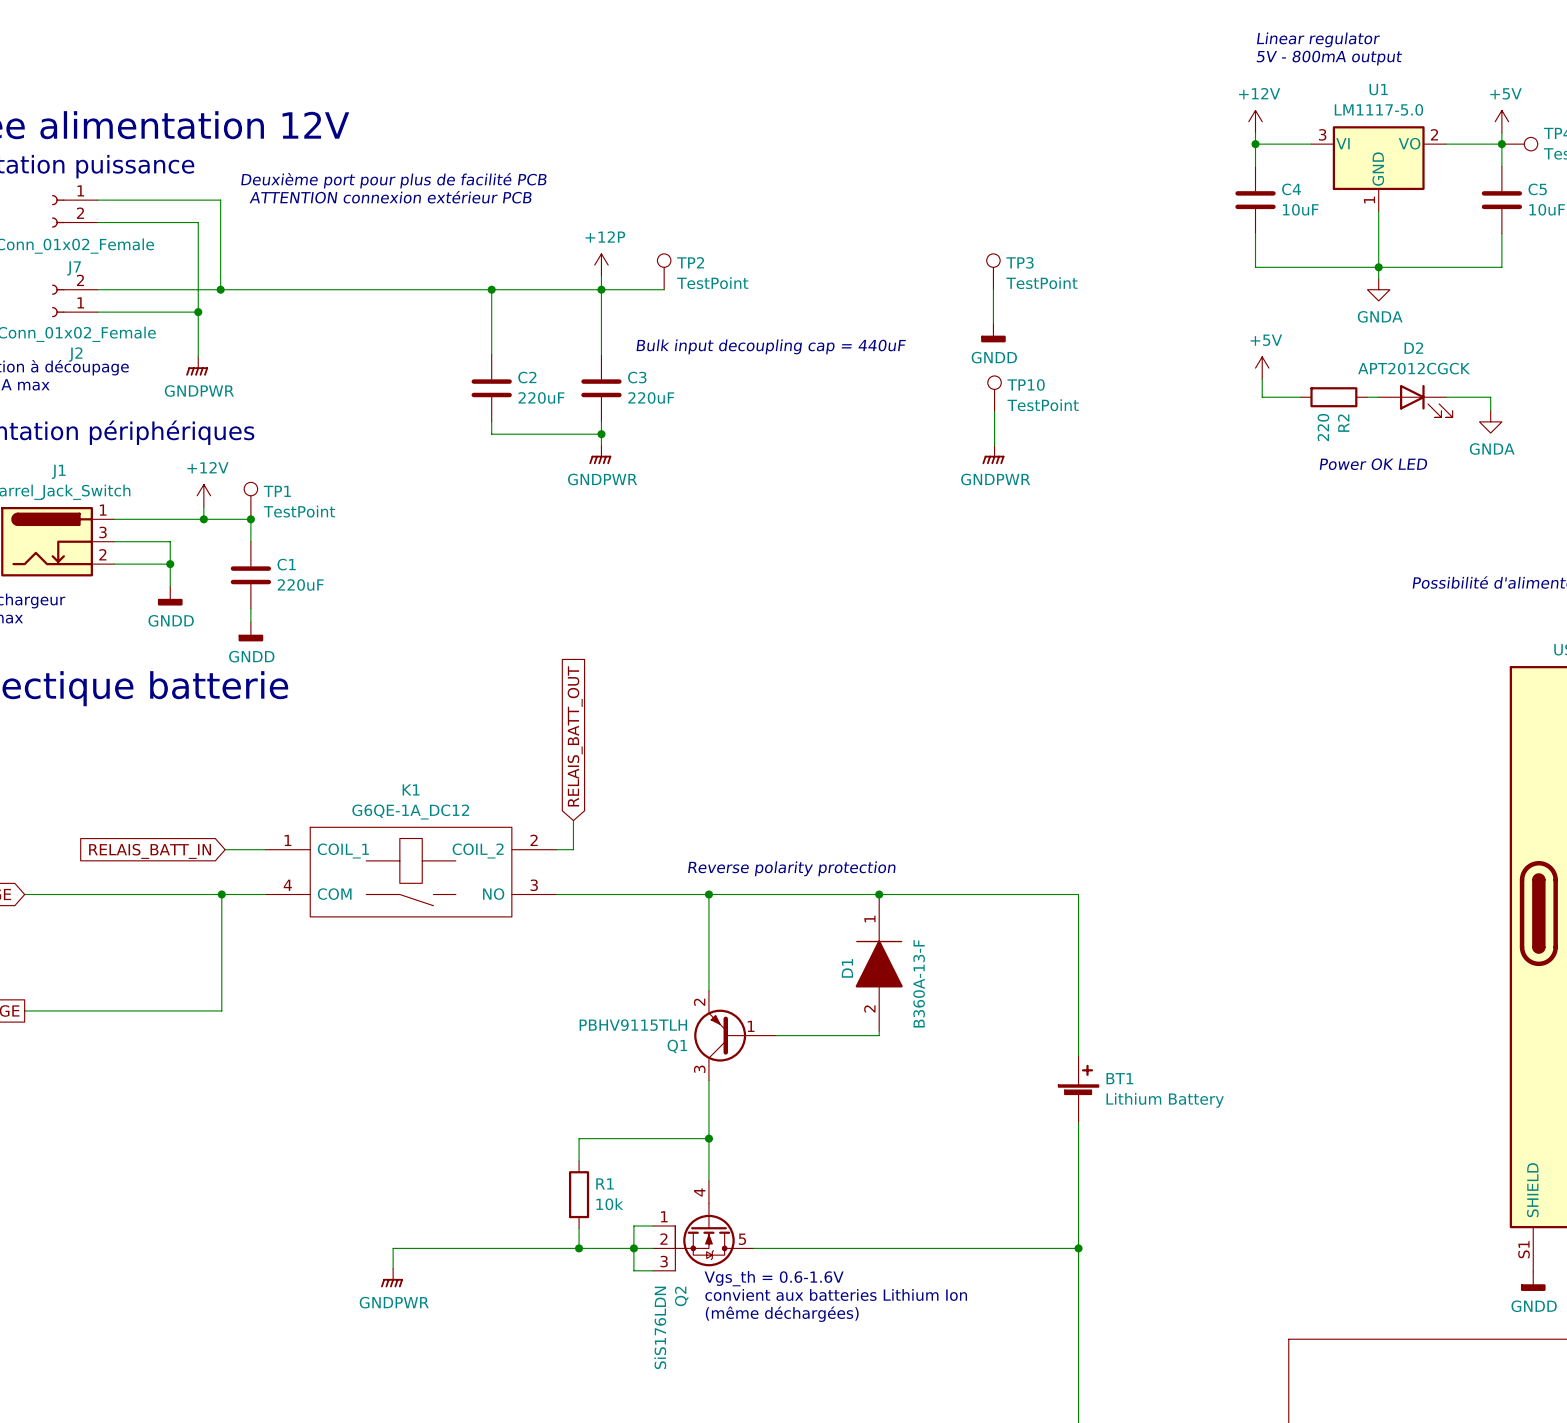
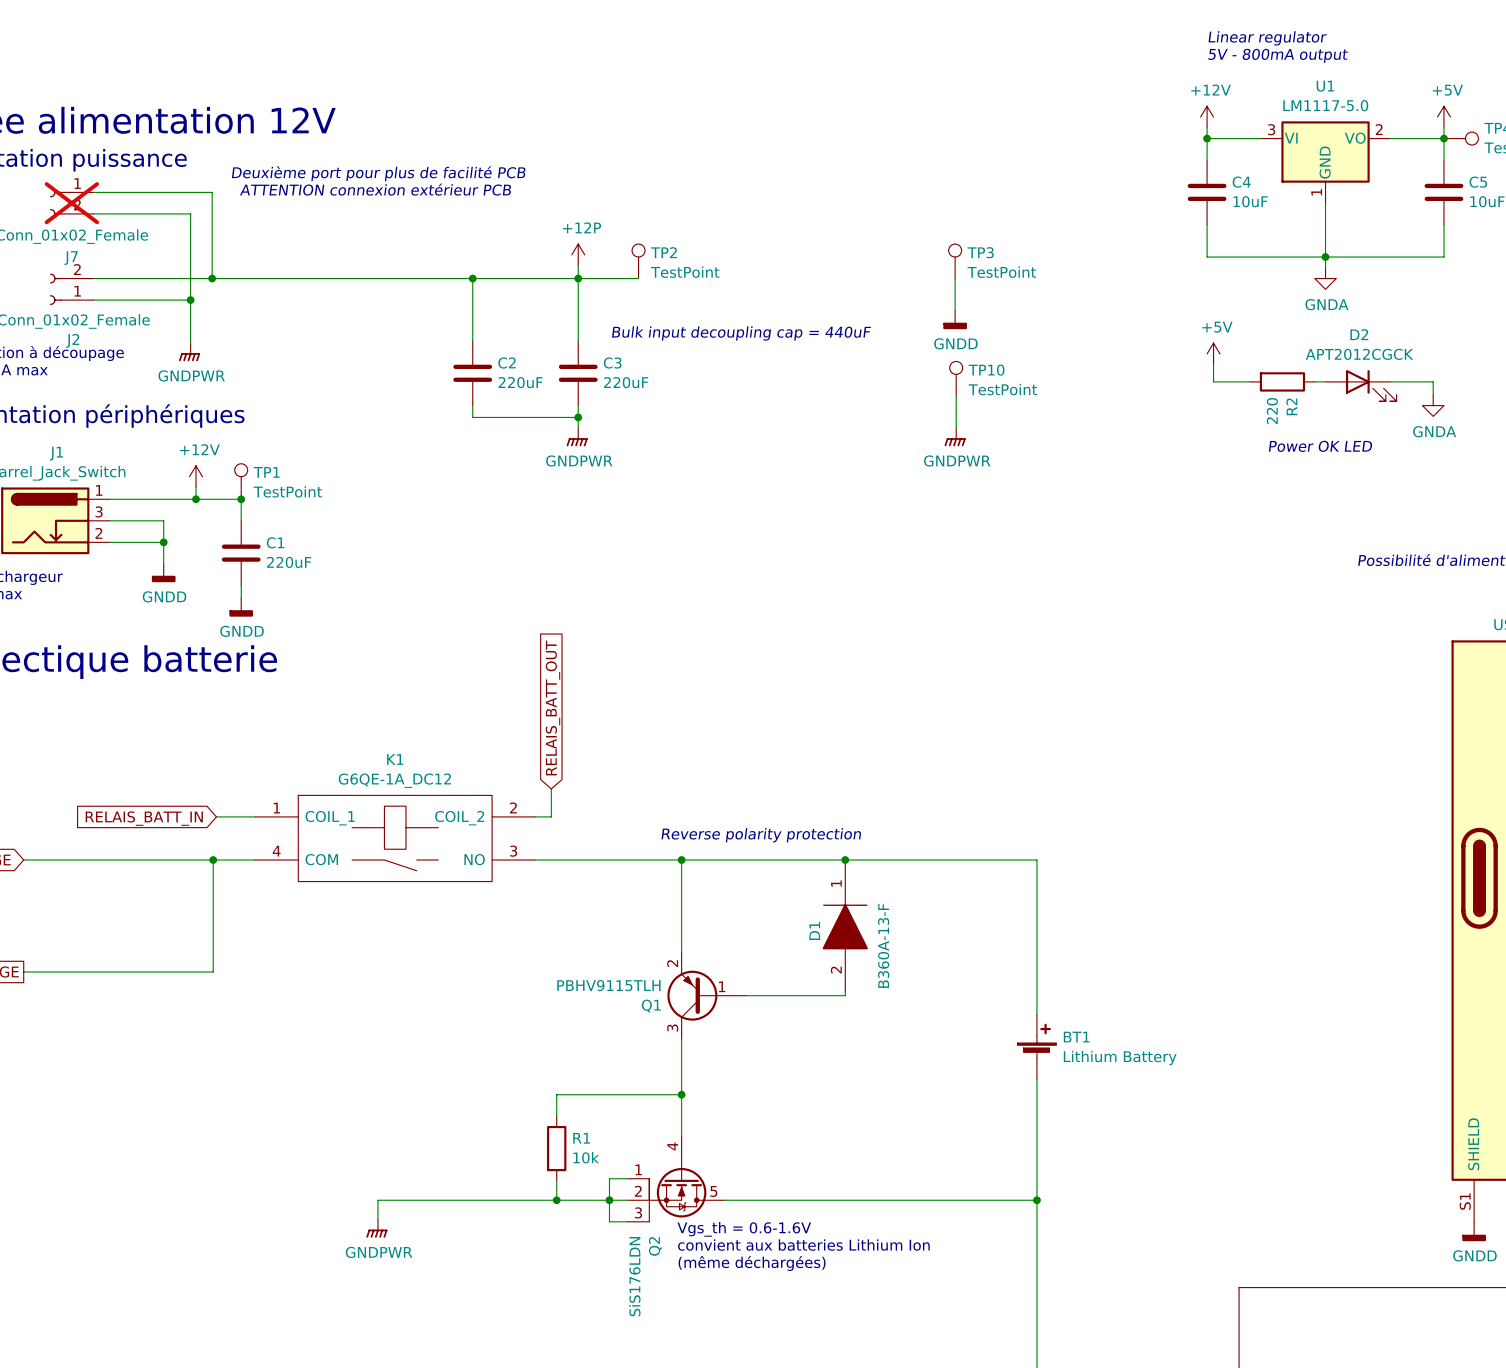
J7 do-not-place cross: none -> (71, 203)

